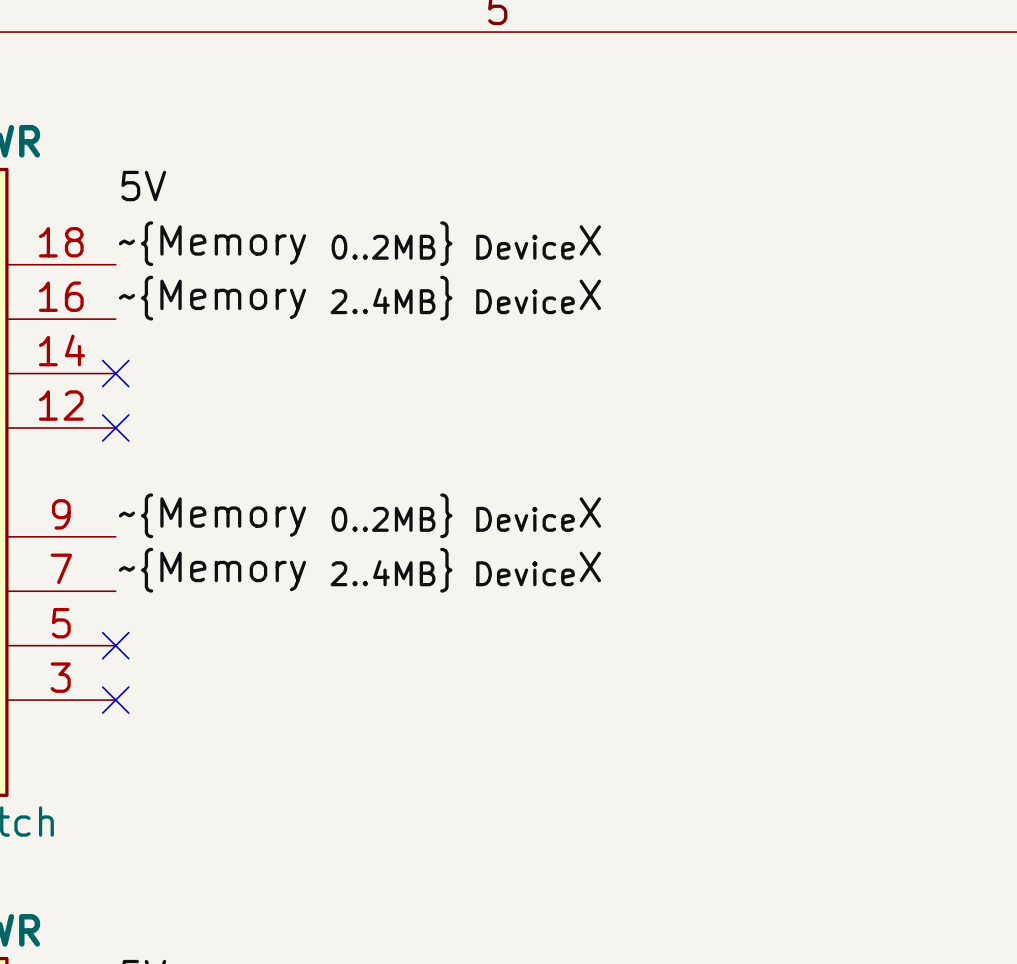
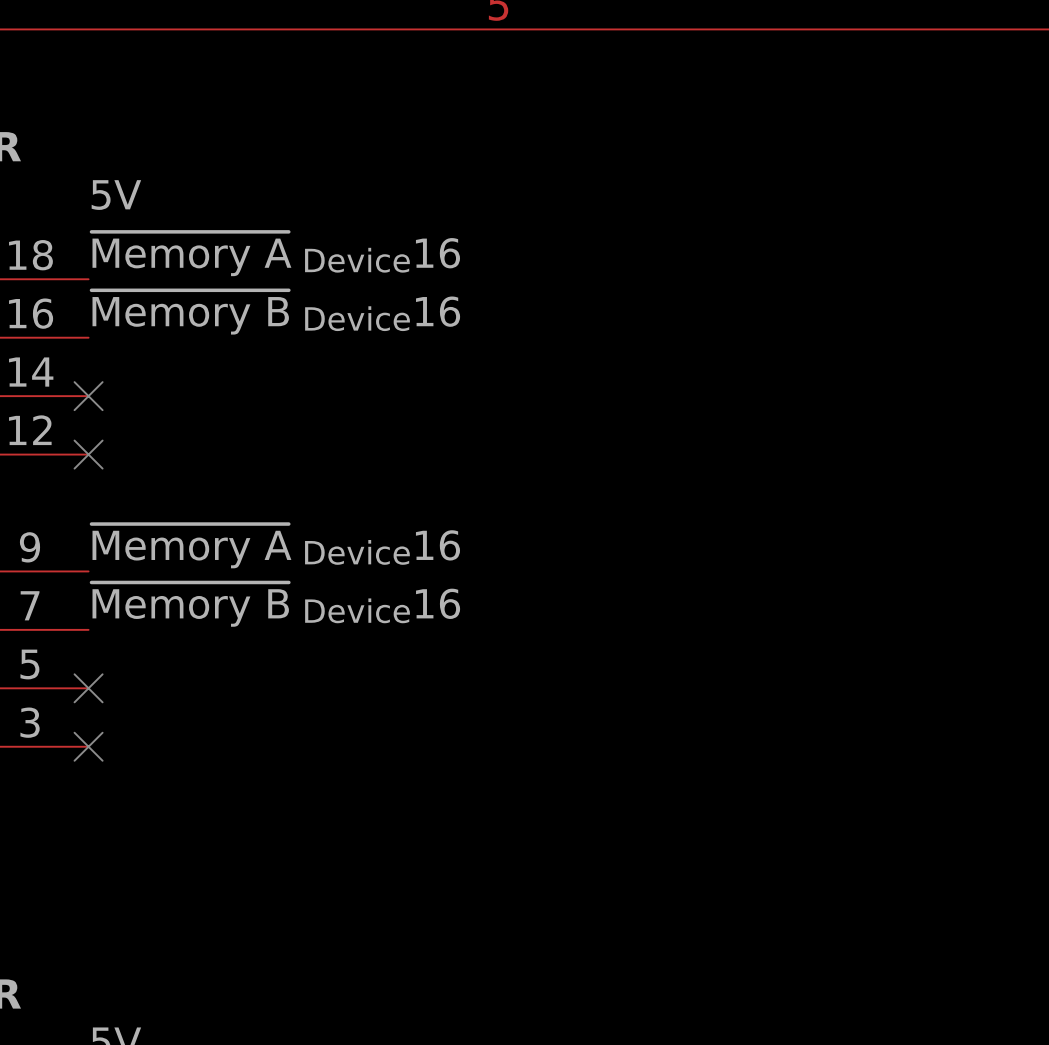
label: ~{Memory 0..2MB} DeviceX (359, 243) -> ~{Memory A} Device16 (275, 254)
label: ~{Memory 2..4MB} DeviceX (359, 298) -> ~{Memory B} Device16 (275, 312)
label: ~{Memory 0..2MB} DeviceX (359, 515) -> ~{Memory A} Device16 (275, 546)
label: ~{Memory 2..4MB} DeviceX (359, 570) -> ~{Memory B} Device16 (275, 604)

